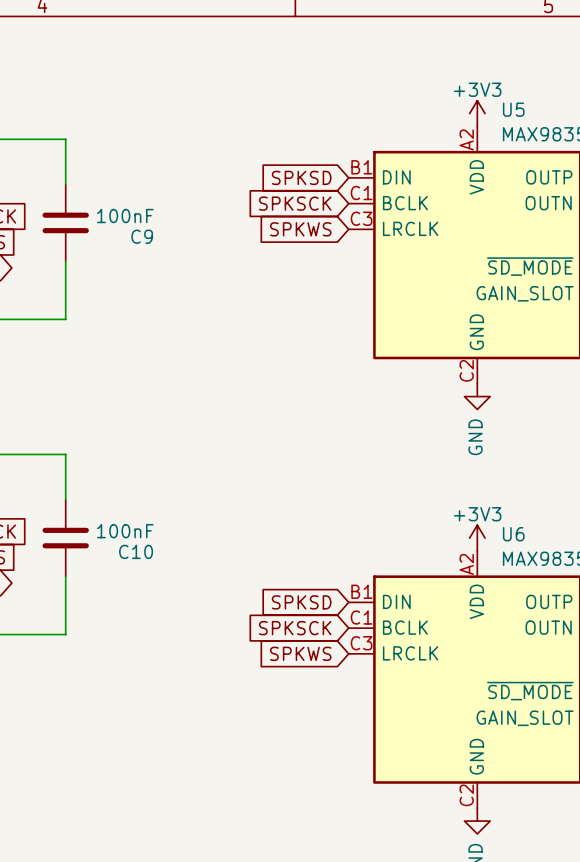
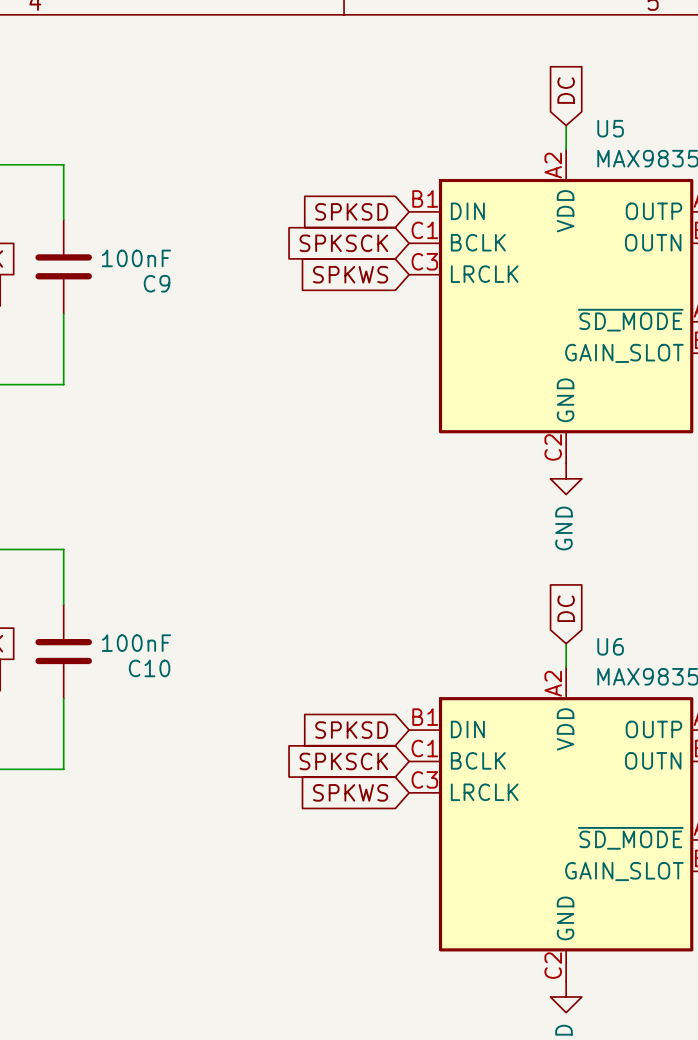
global label: none -> DC (566, 90)
power symbol: +3V3 (477, 113) -> none
global label: none -> DC (566, 608)
power symbol: +3V3 (477, 538) -> none

